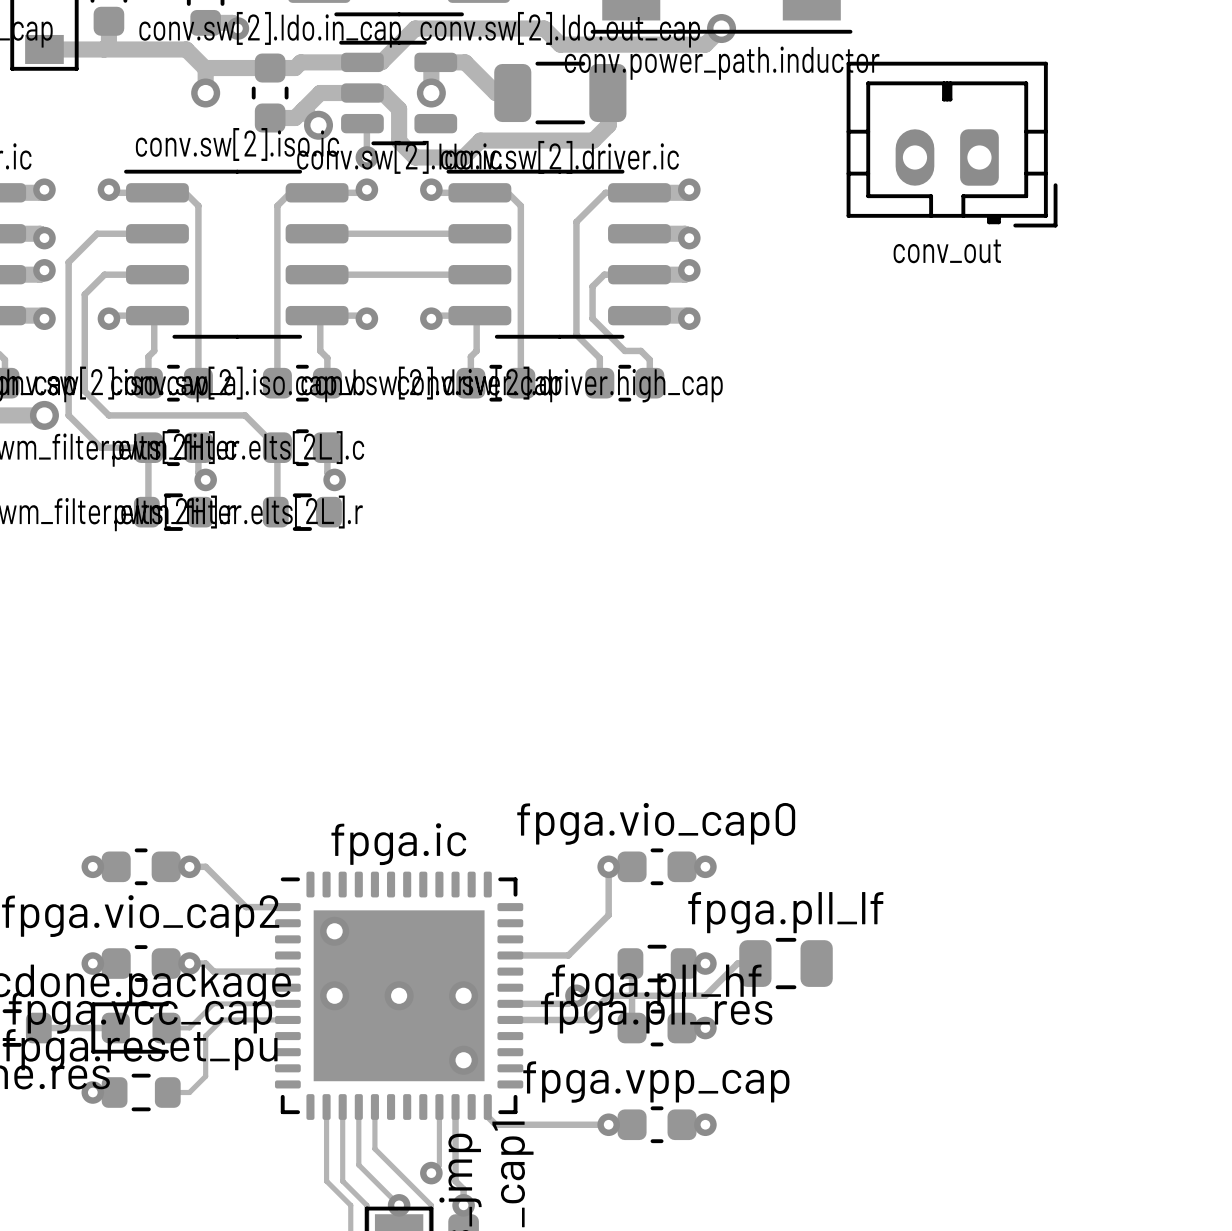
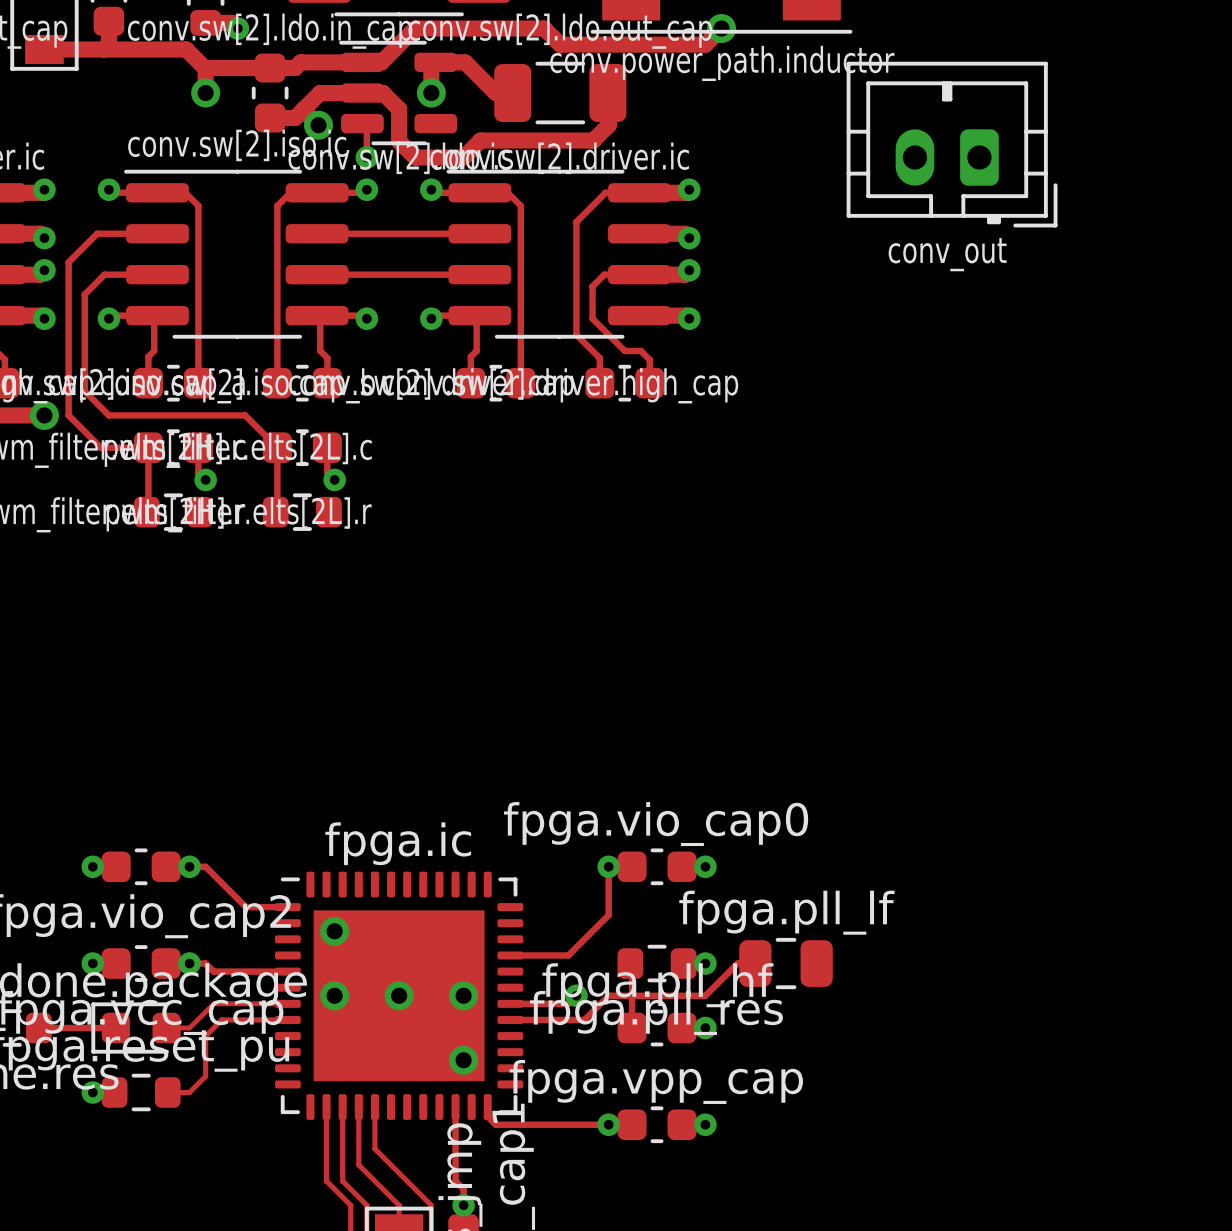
track: (439, 1107) (439, 1165) (431, 1173) -> none
via: (431, 1173) -> none
via: (399, 1205) -> none

